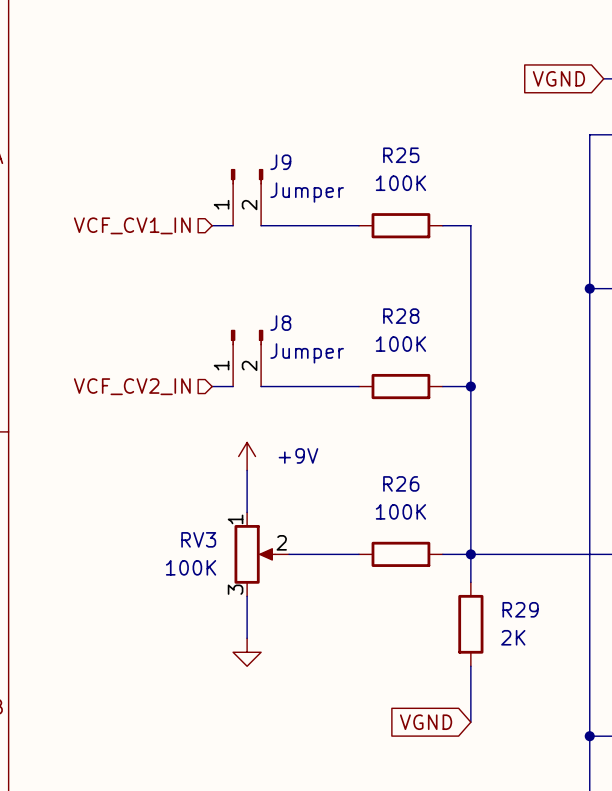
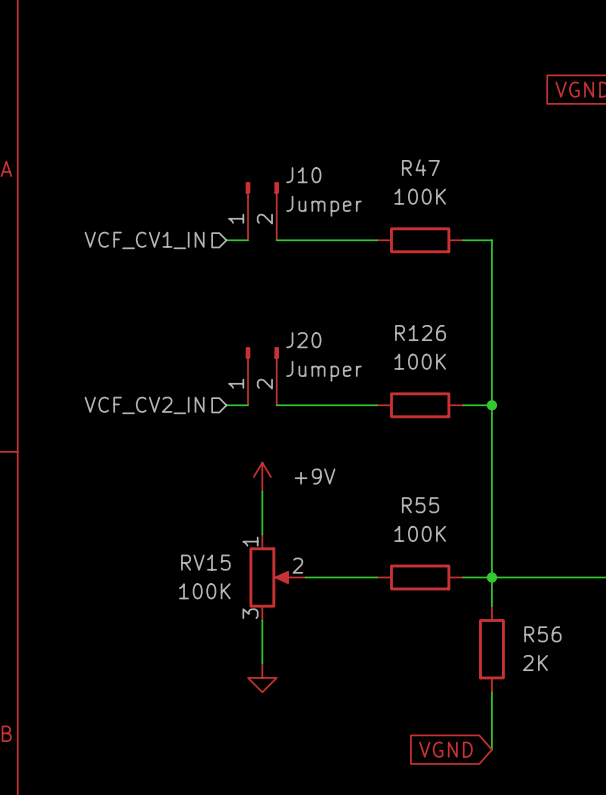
R25 name: R25 (401, 155) -> R47 (420, 167)
J9 name: J9 (280, 162) -> J10 (303, 175)
R28 name: R28 (401, 316) -> R126 (420, 333)
J8 name: J8 (280, 323) -> J20 (303, 340)
R26 name: R26 (401, 483) -> R55 (420, 505)
RV3 name: RV3 (198, 539) -> RV15 (205, 562)
R29 name: R29 (520, 609) -> R56 (542, 634)

